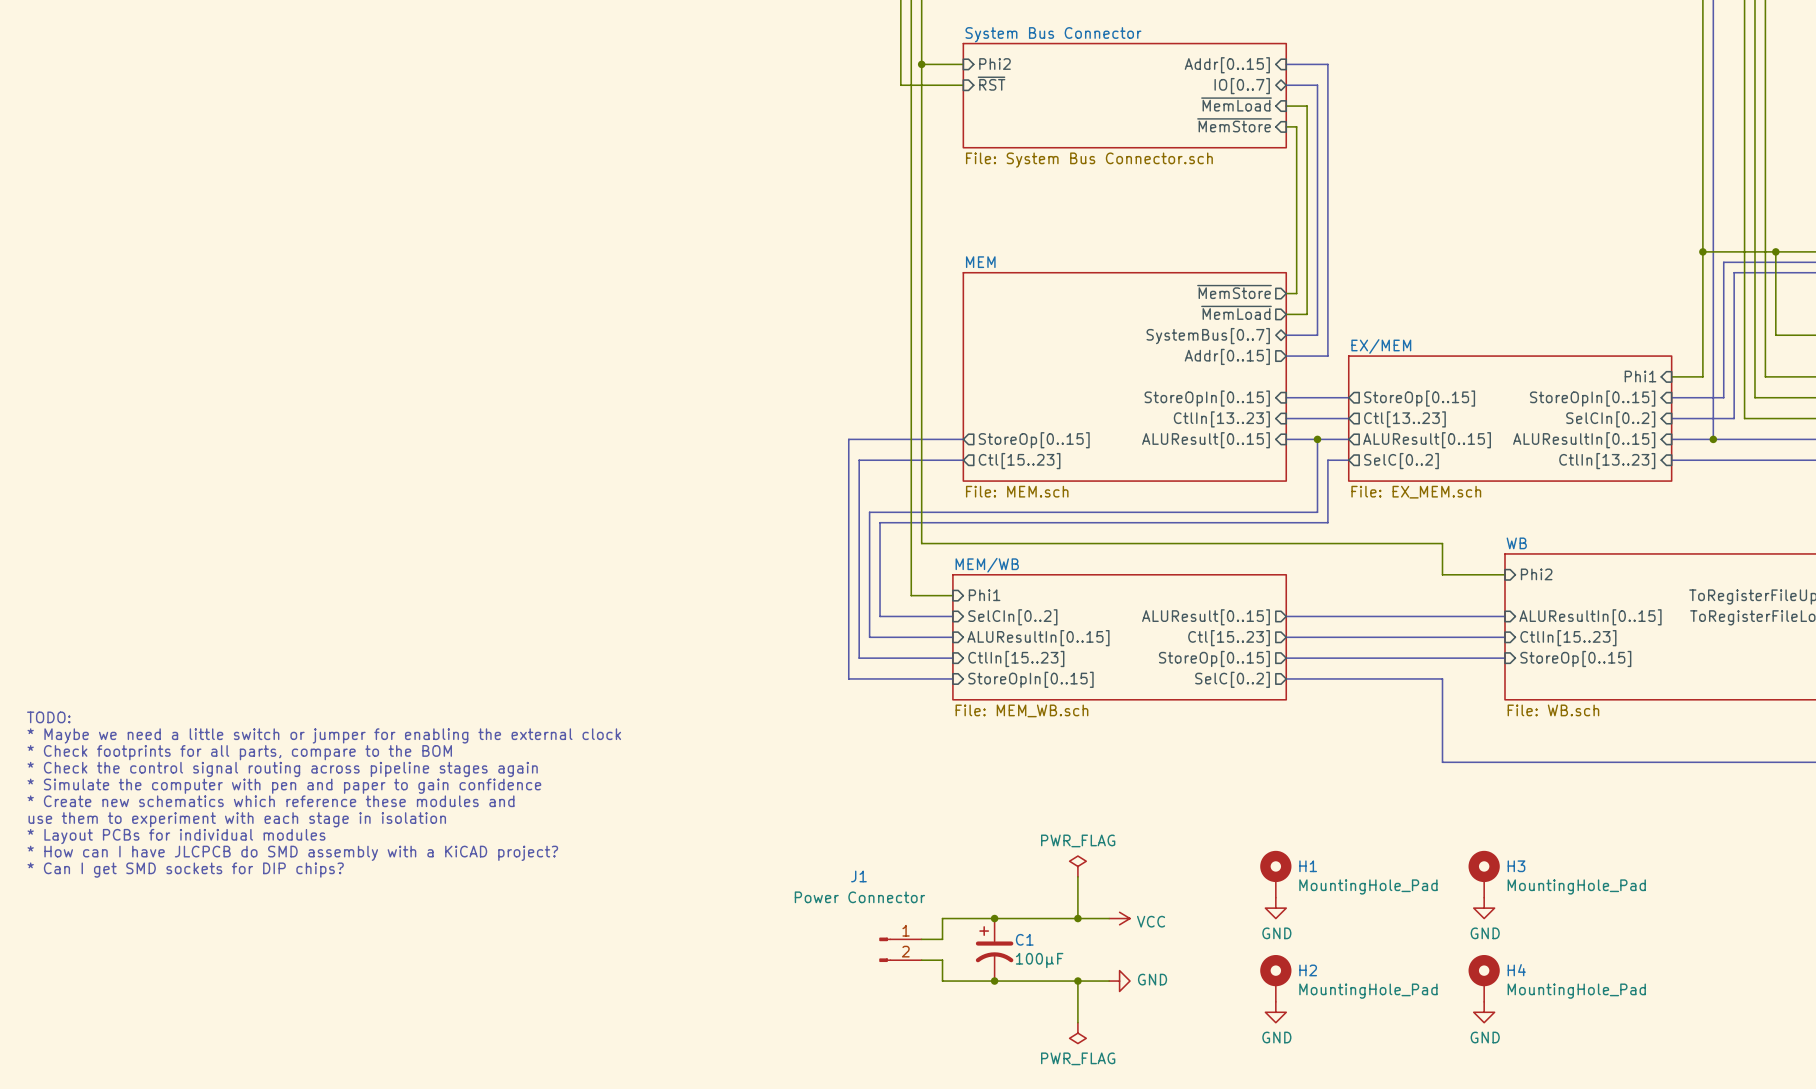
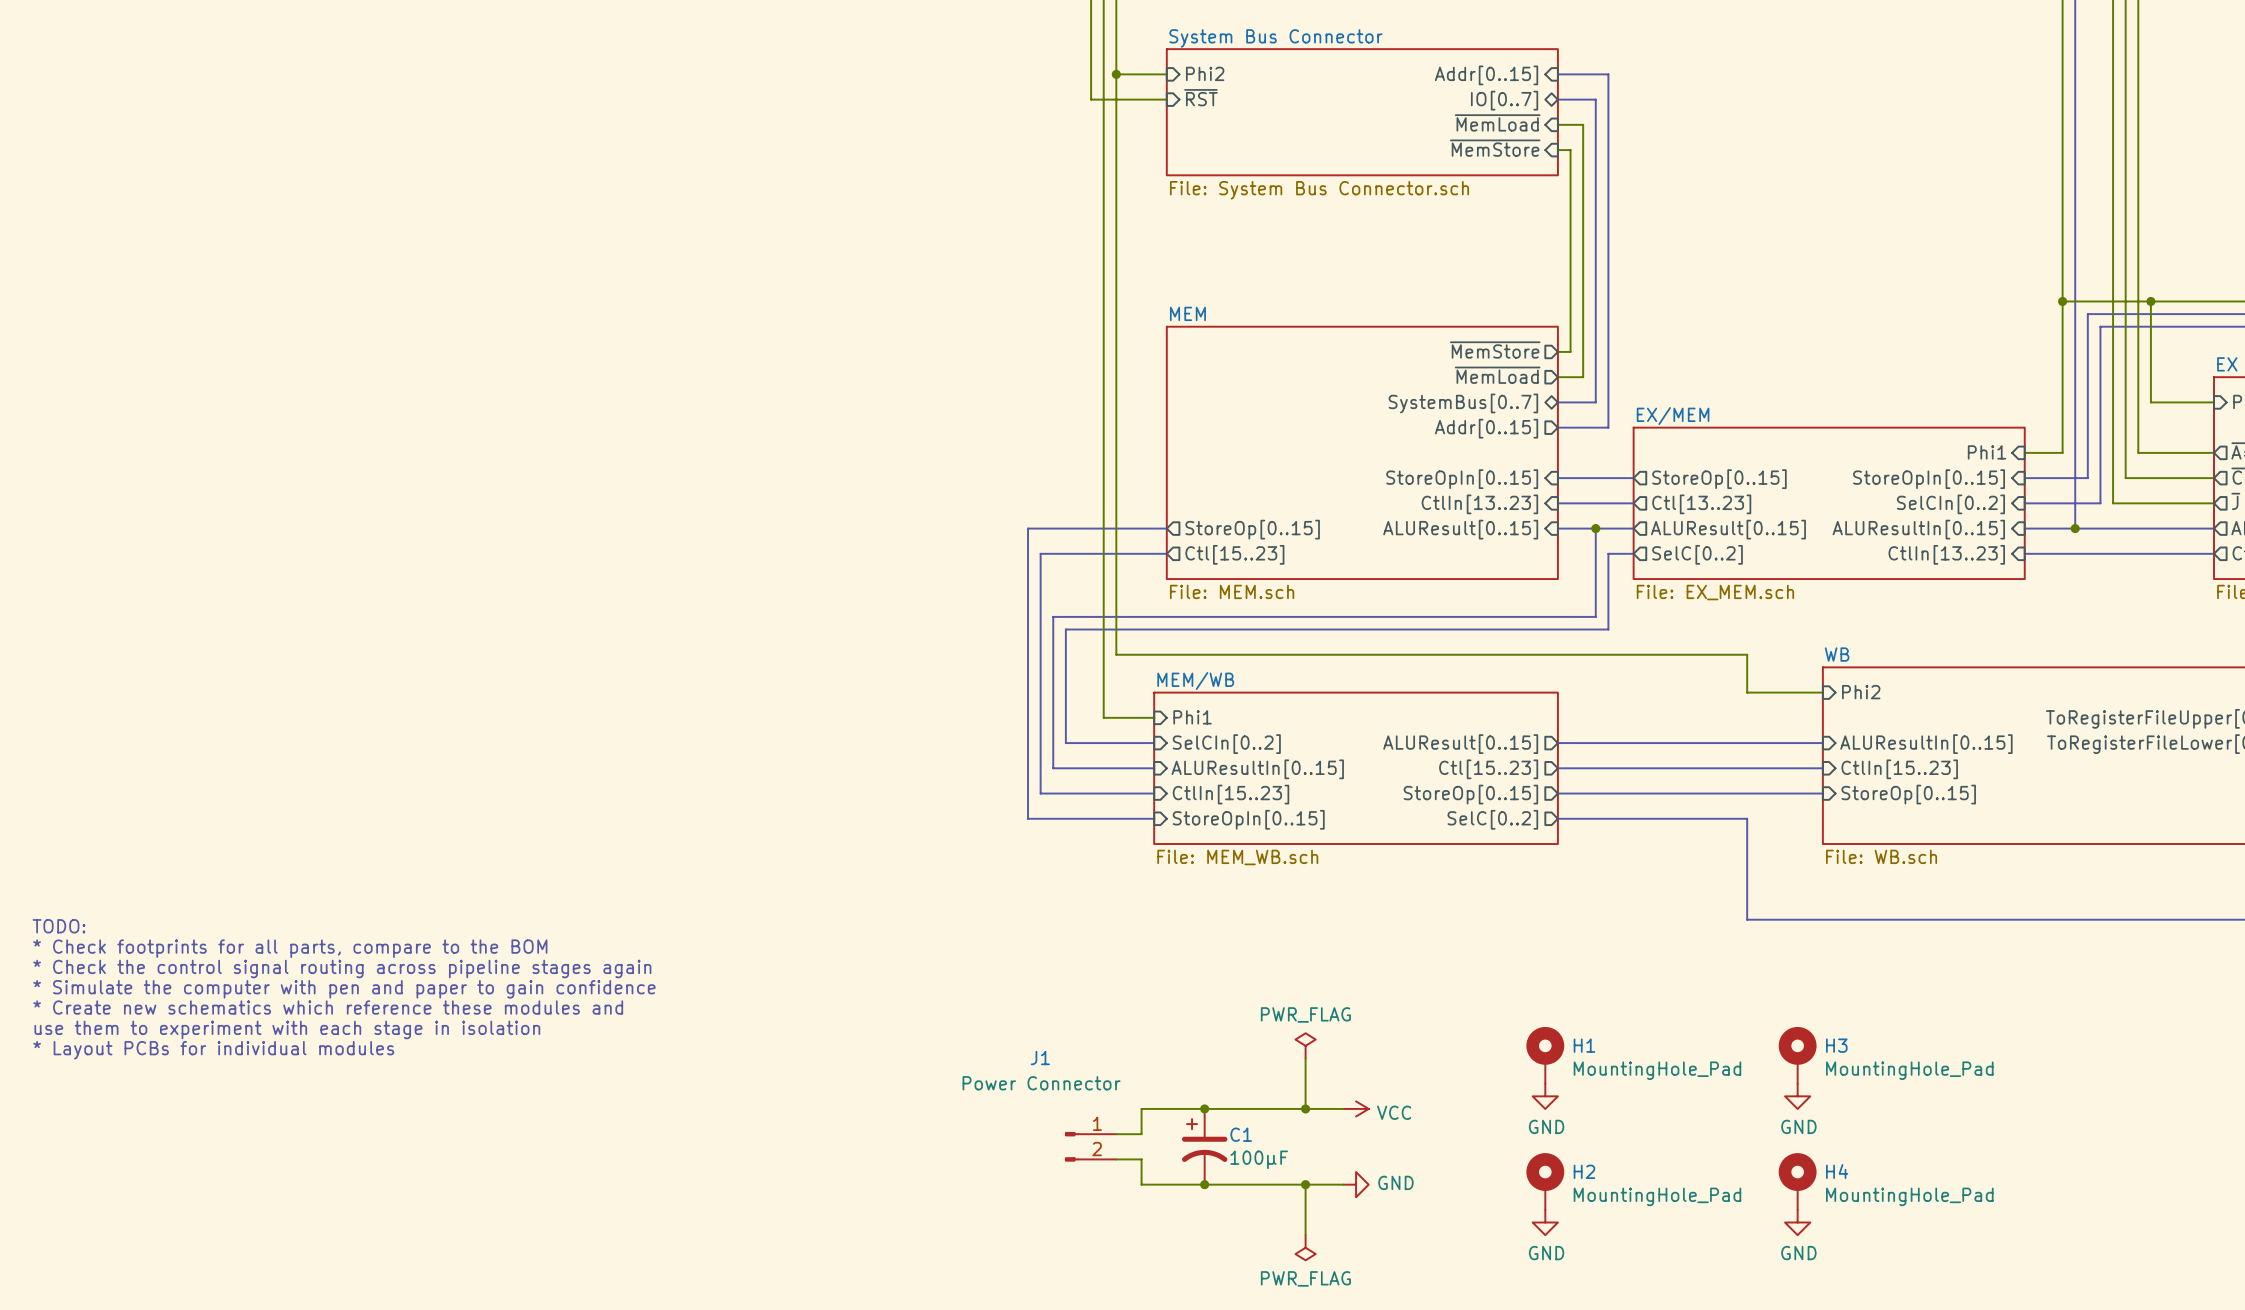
text: TODO: (48, 717) -> none
text: * Maybe we need a little switch or jumper for enabling the external clock (324, 735) -> none
text: * Check footprints for all parts, compare to the BOM (239, 752) -> none
text: * Check the control signal routing across pipeline stages again (282, 769) -> TODO: (59, 926)
text: * Simulate the computer with pen and paper to gain confidence (284, 786) -> * Check footprints for all parts, compare to the BOM (290, 948)
text: * Create new schematics which reference these modules and (270, 801) -> * Check the control signal routing across pipeline stages again (342, 969)
text: use them to experiment with each stage in isolation (237, 819) -> * Simulate the computer with pen and paper to gain confidence (344, 989)
text: * Layout PCBs for individual modules (176, 836) -> * Create new schematics which reference these modules and (328, 1007)
text: * How can I have JLCPCB do SMD assembly with a KiCAD project? (292, 853) -> use them to experiment with each stage in isolation (287, 1029)
text: * Can I get SMD sockets for DIP chips? (185, 870) -> * Layout PCBs for individual modules (213, 1050)

